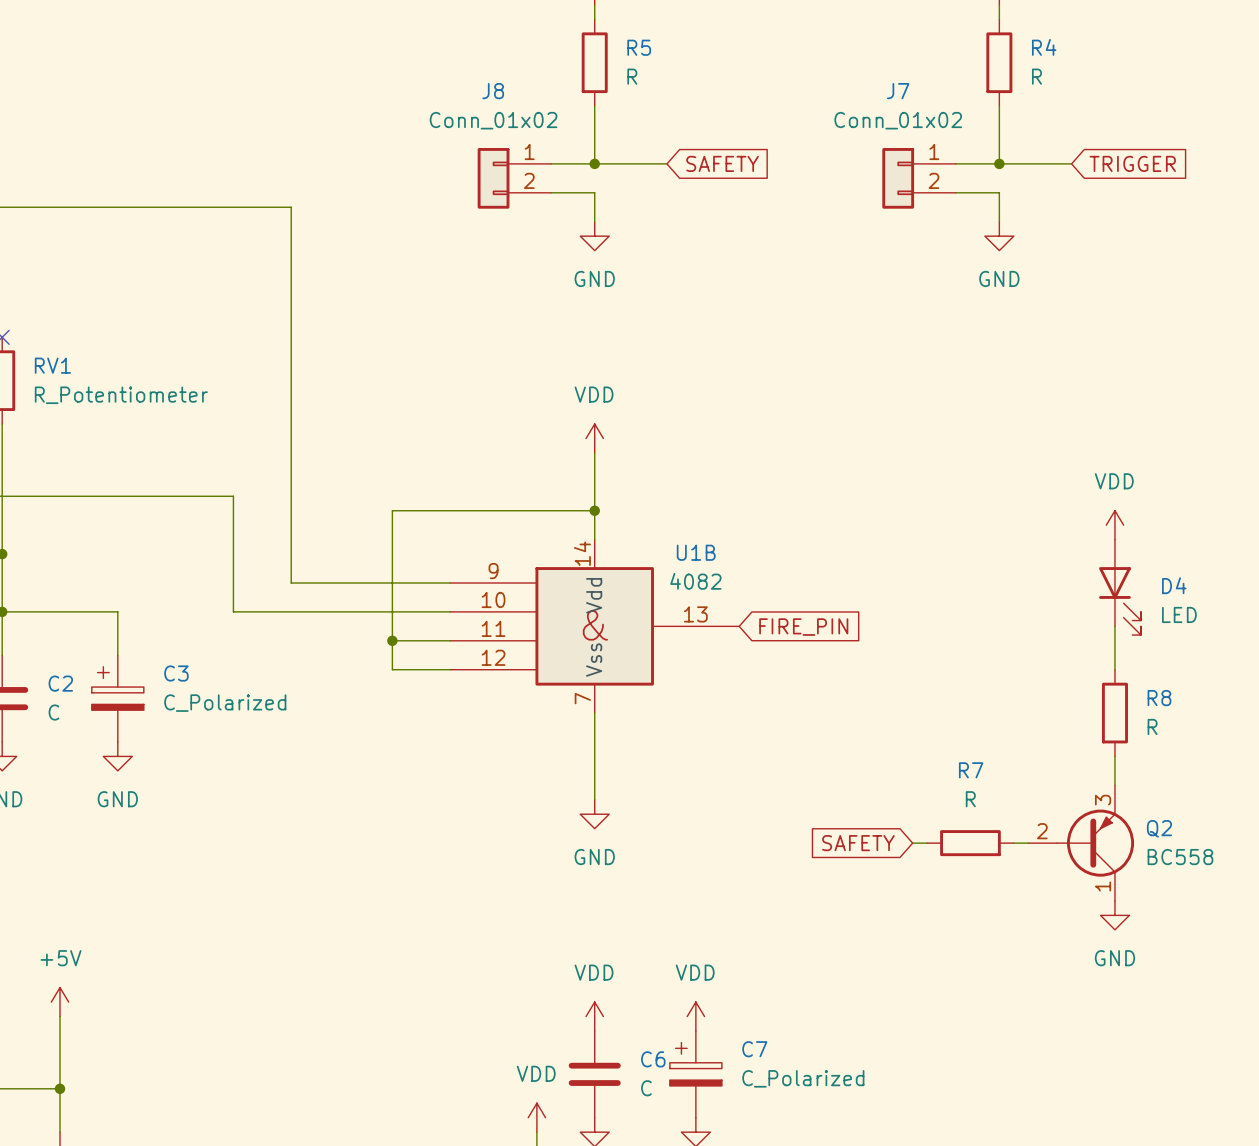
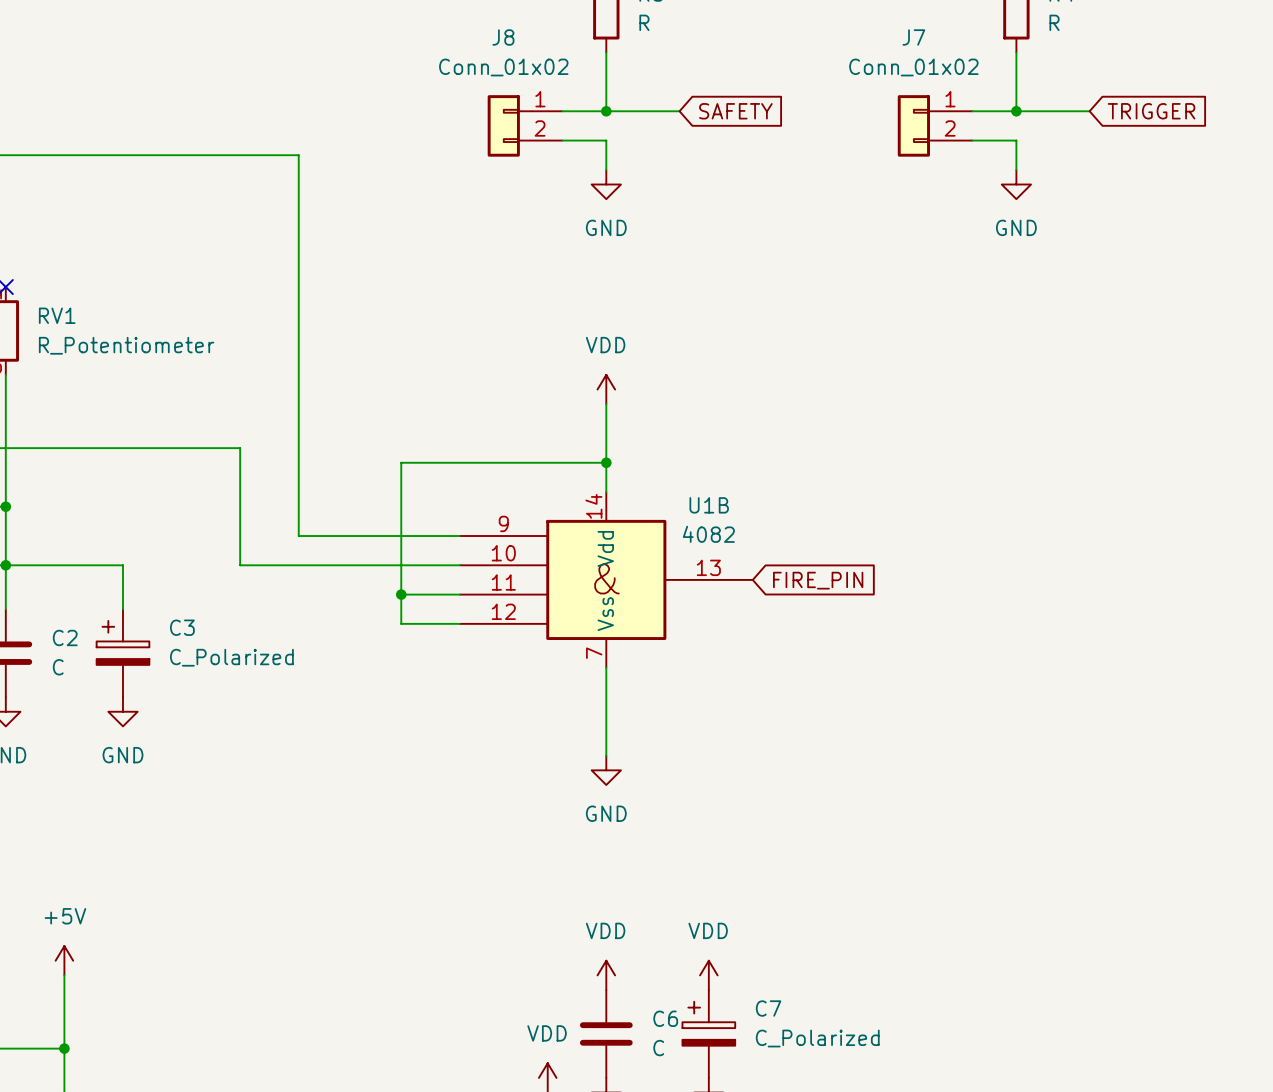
power symbol: VDD (1114, 525) -> none
D4: LED (1120, 587) -> none
wire: (1114, 626) (1114, 669) -> none
R8: R (1114, 713) -> none
wire: (1114, 756) (1114, 785) -> none
global label: SAFETY (858, 843) -> none
wire: (912, 843) (927, 843) -> none
R7: R (970, 843) -> none
wire: (1013, 843) (1028, 843) -> none
Q2: BC558 (1081, 843) -> none
power symbol: GND (1114, 915) -> none

